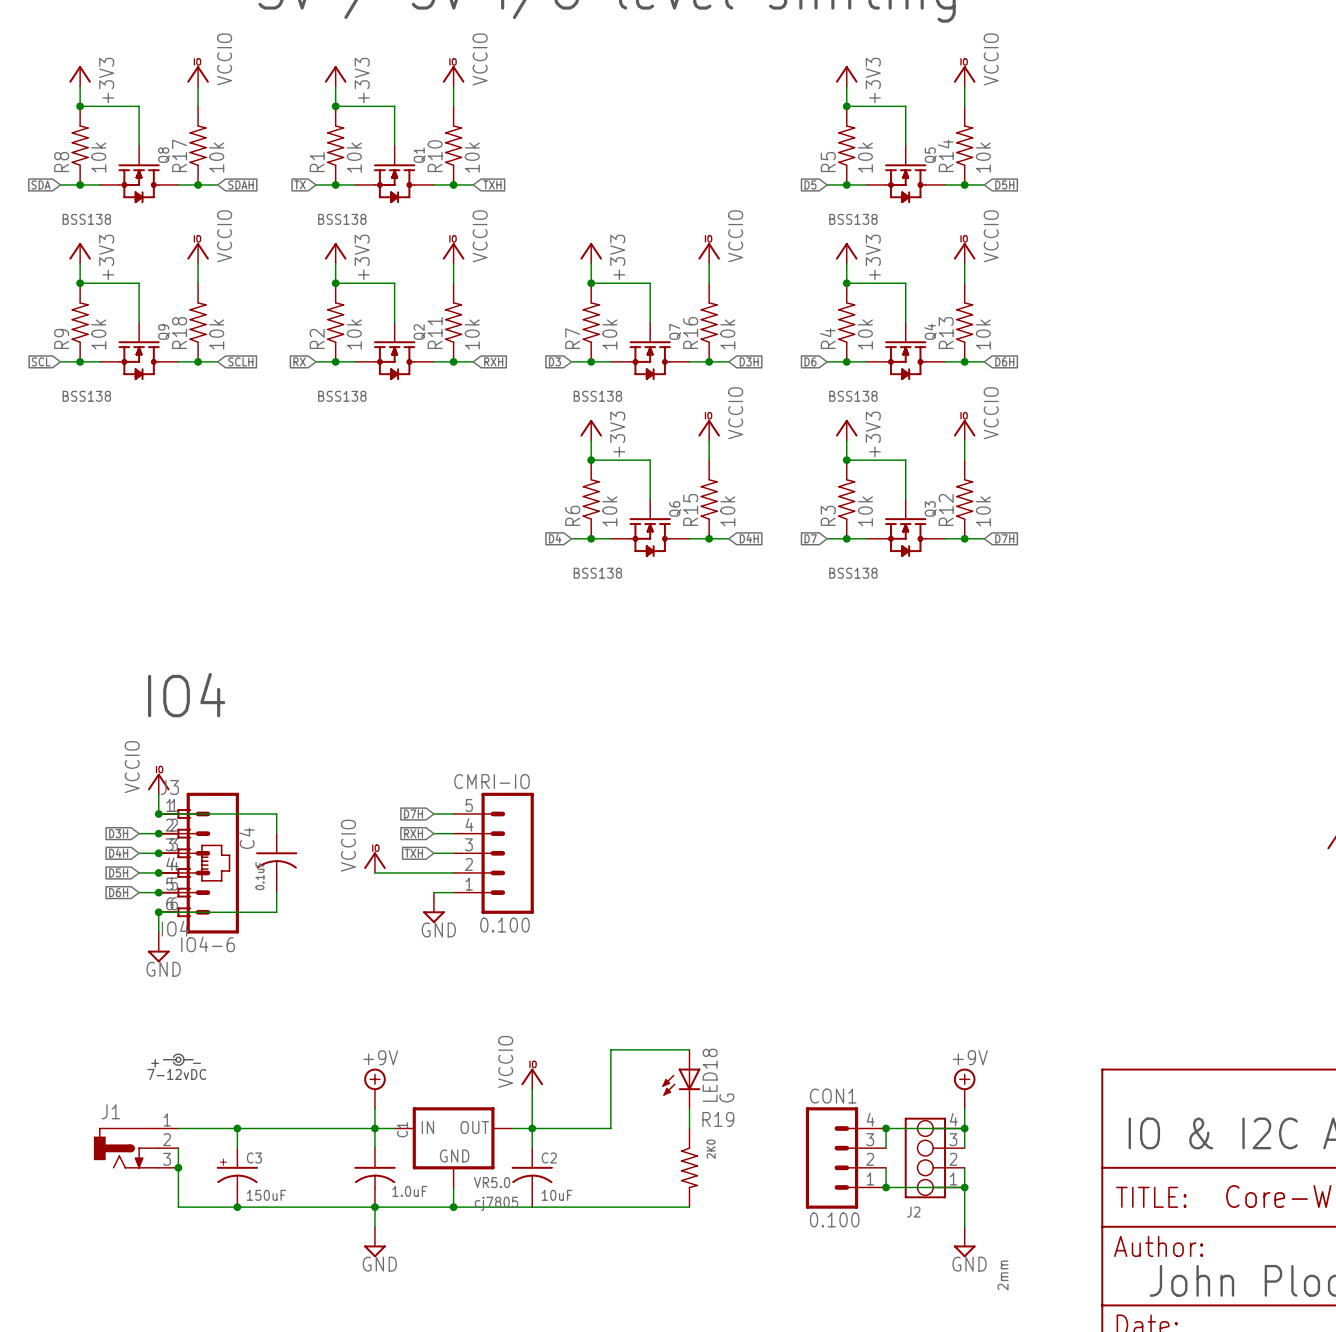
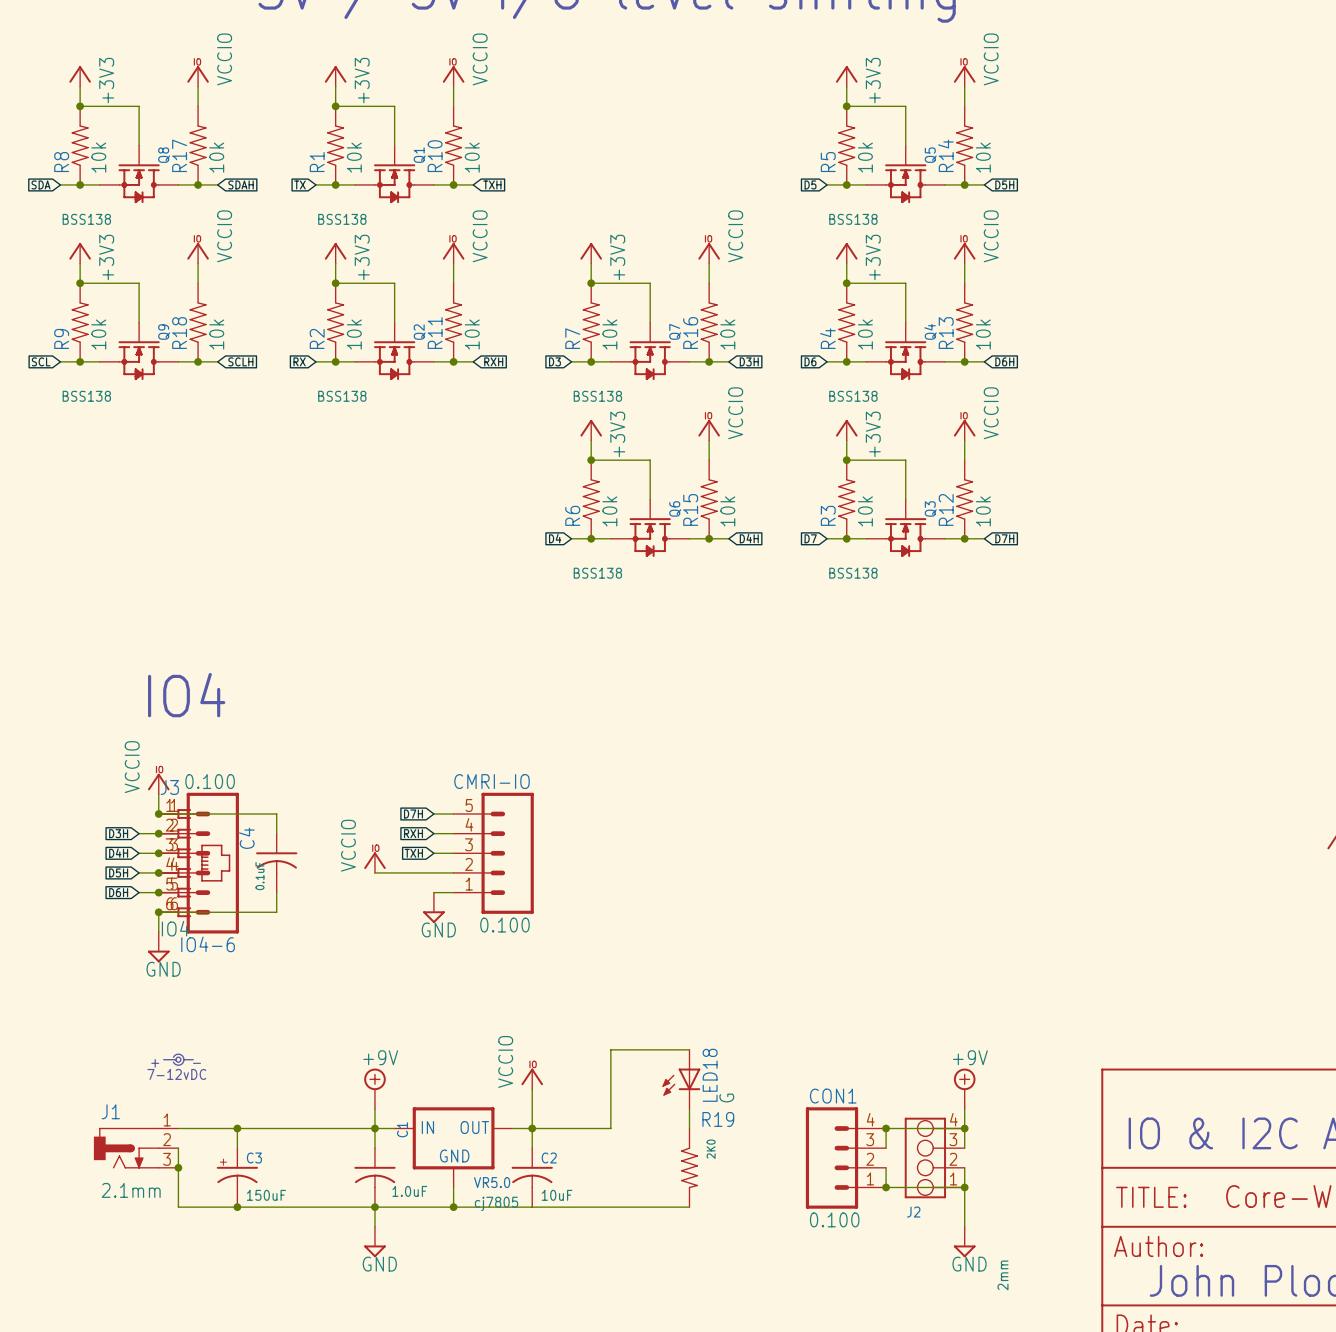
IO4-6 value: none -> 0.100 (210, 781)
J1 value: none -> 2.1mm (131, 1190)

